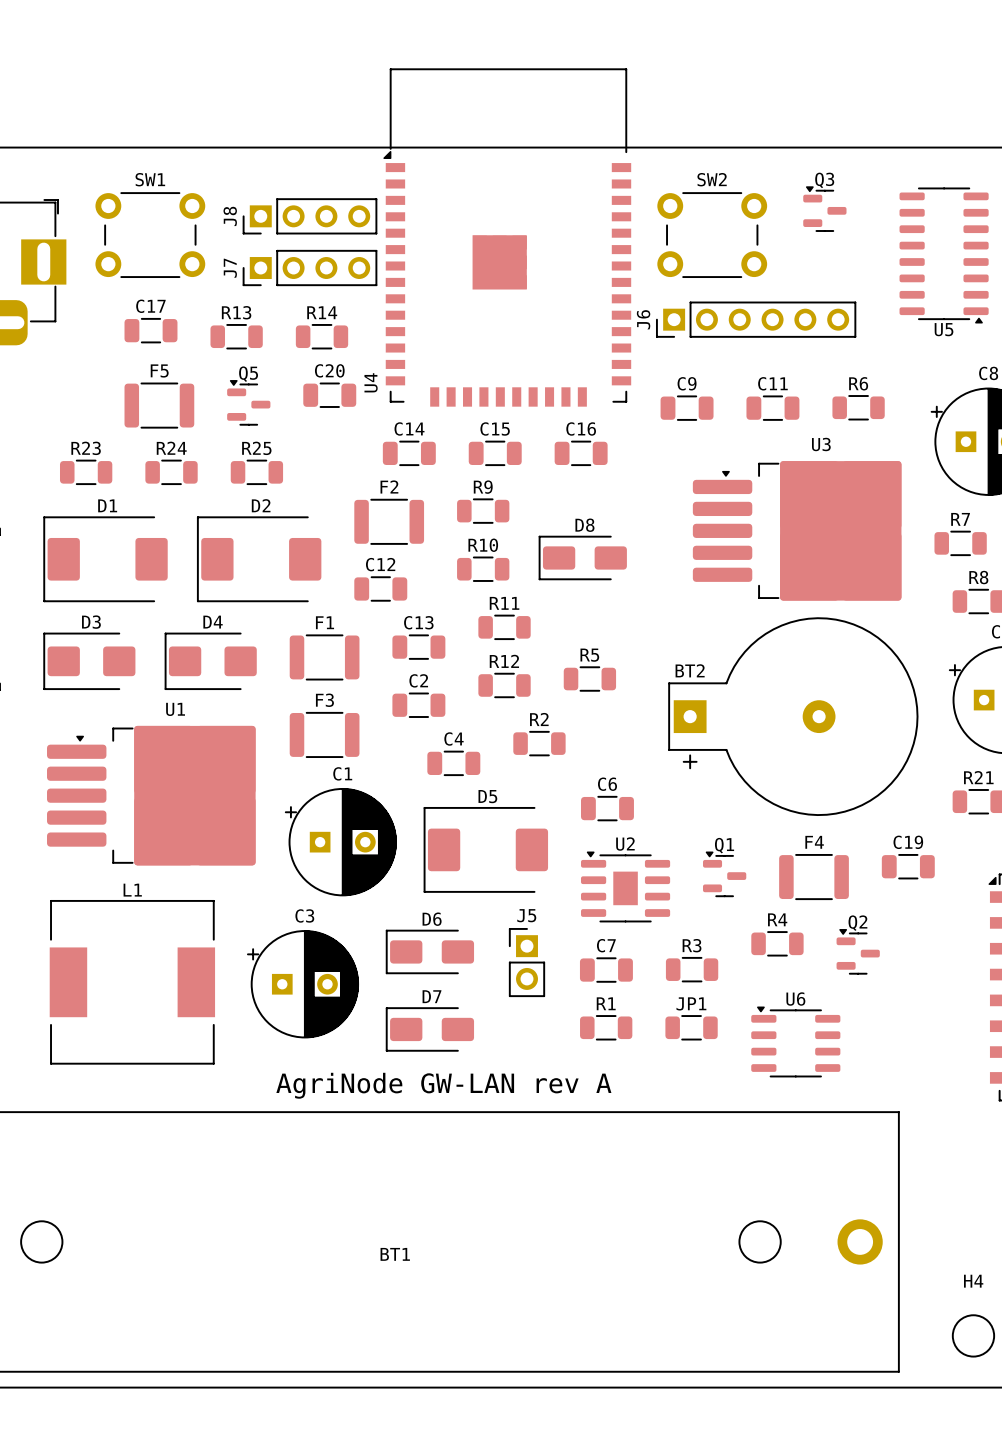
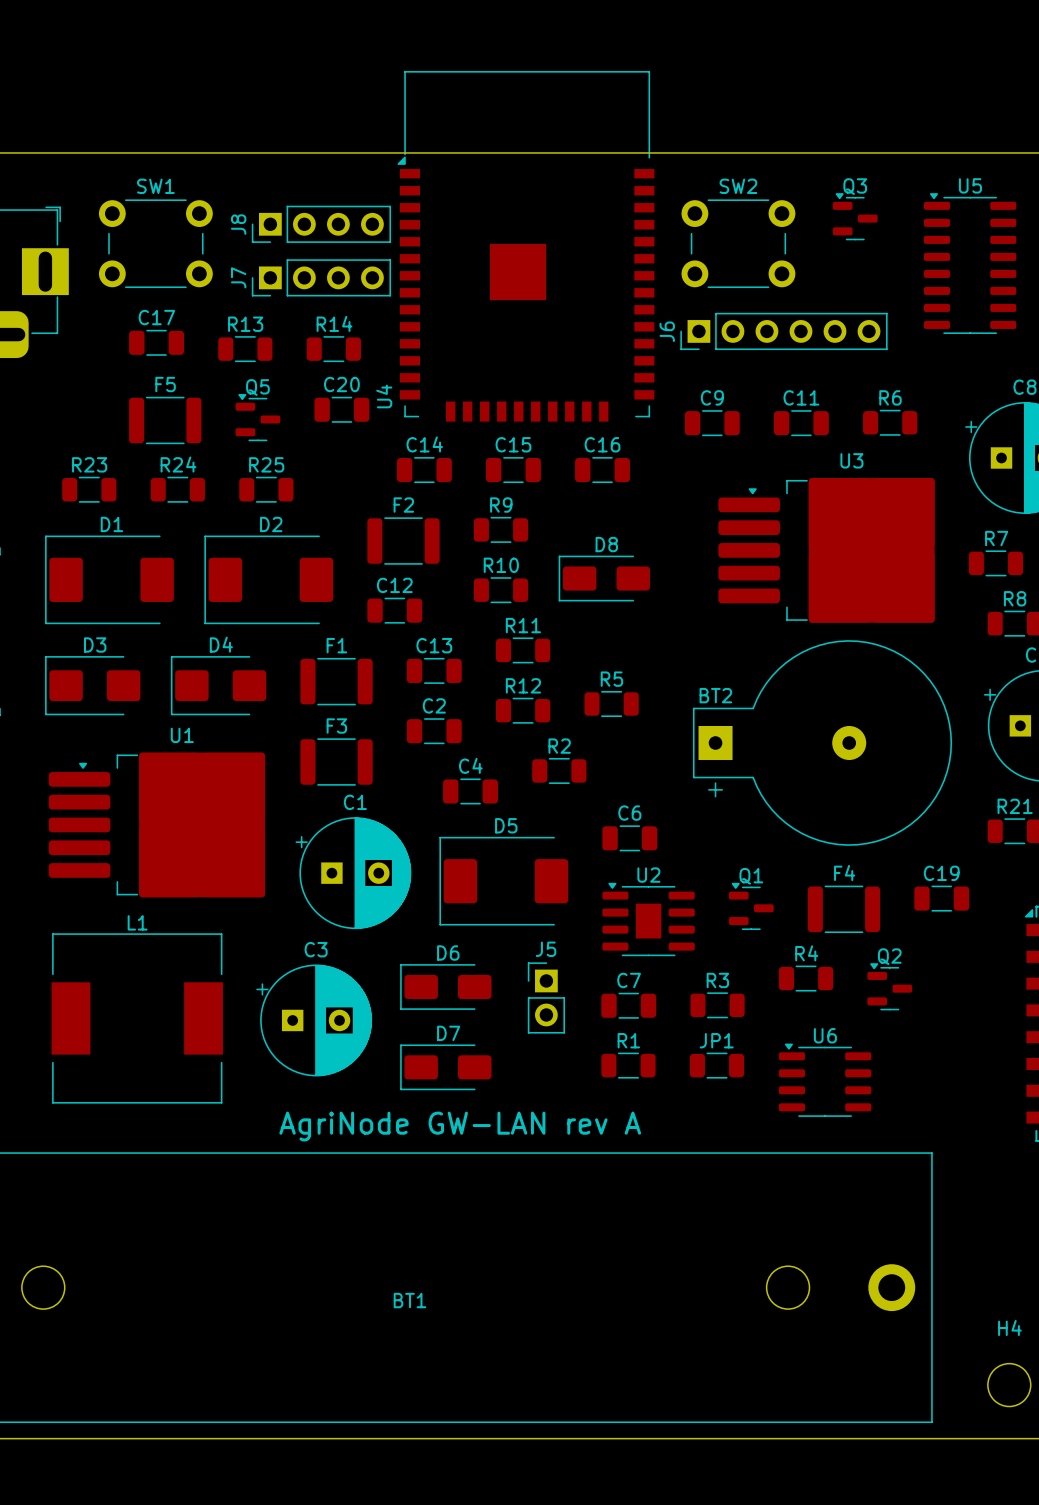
U5 rotation: 0° (944, 255) -> 180° (970, 263)

